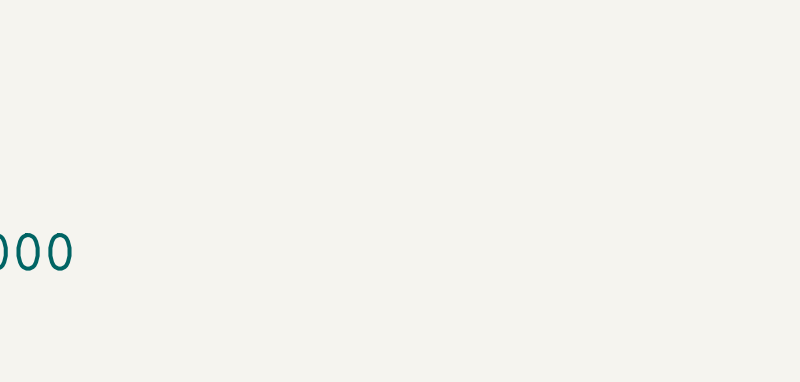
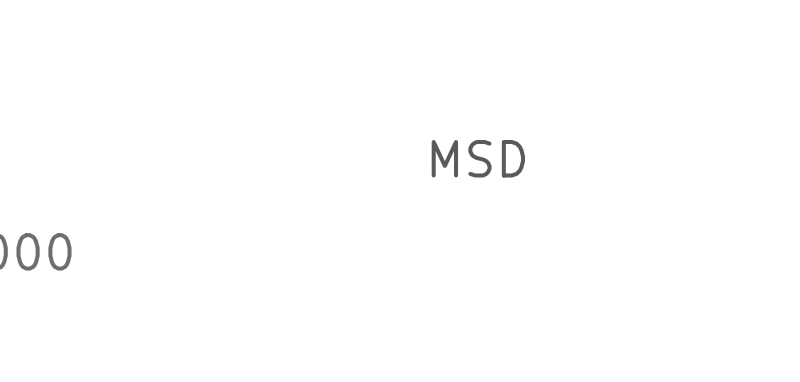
text: none -> MSD (478, 158)

